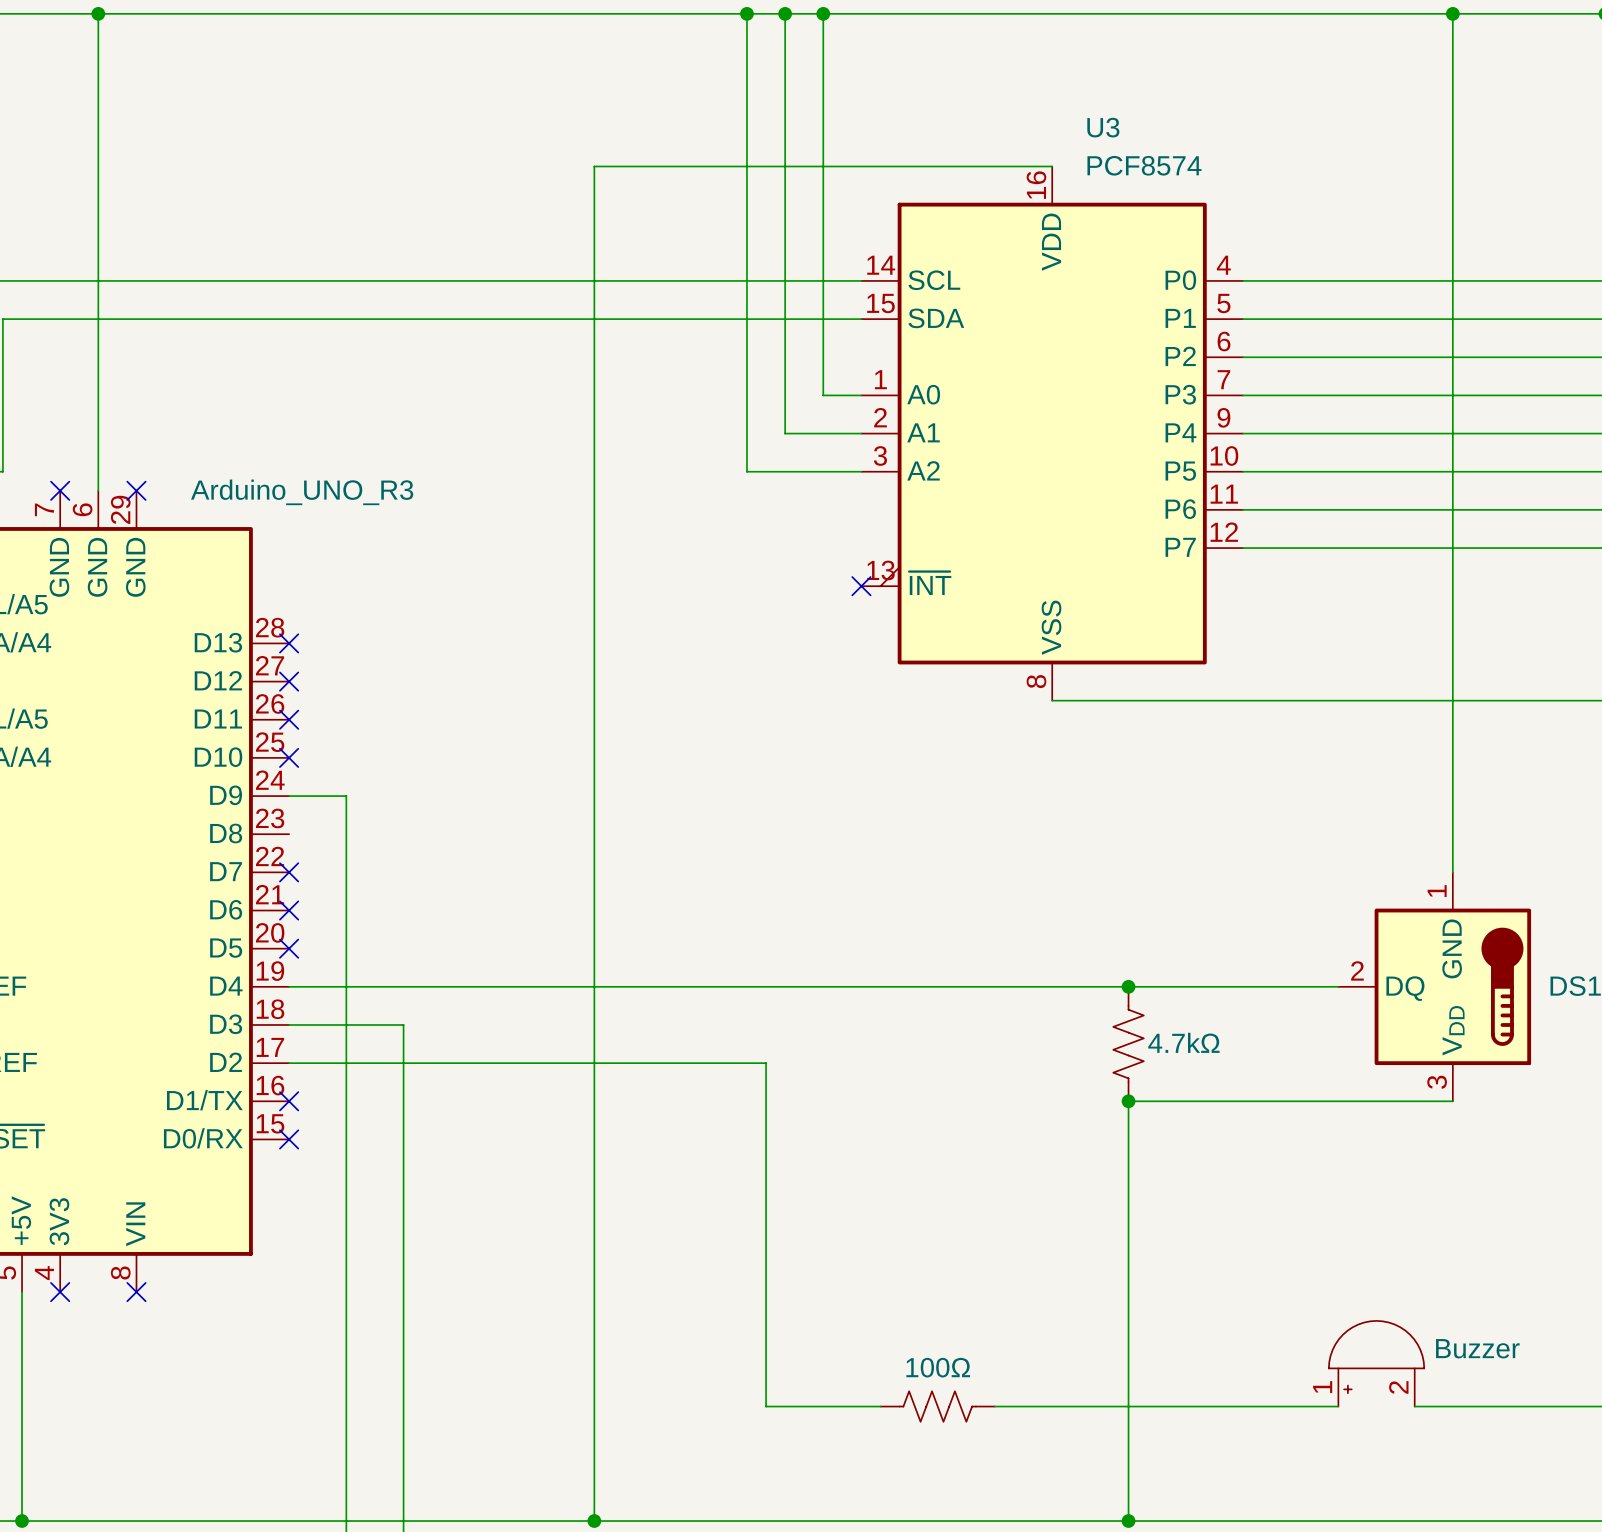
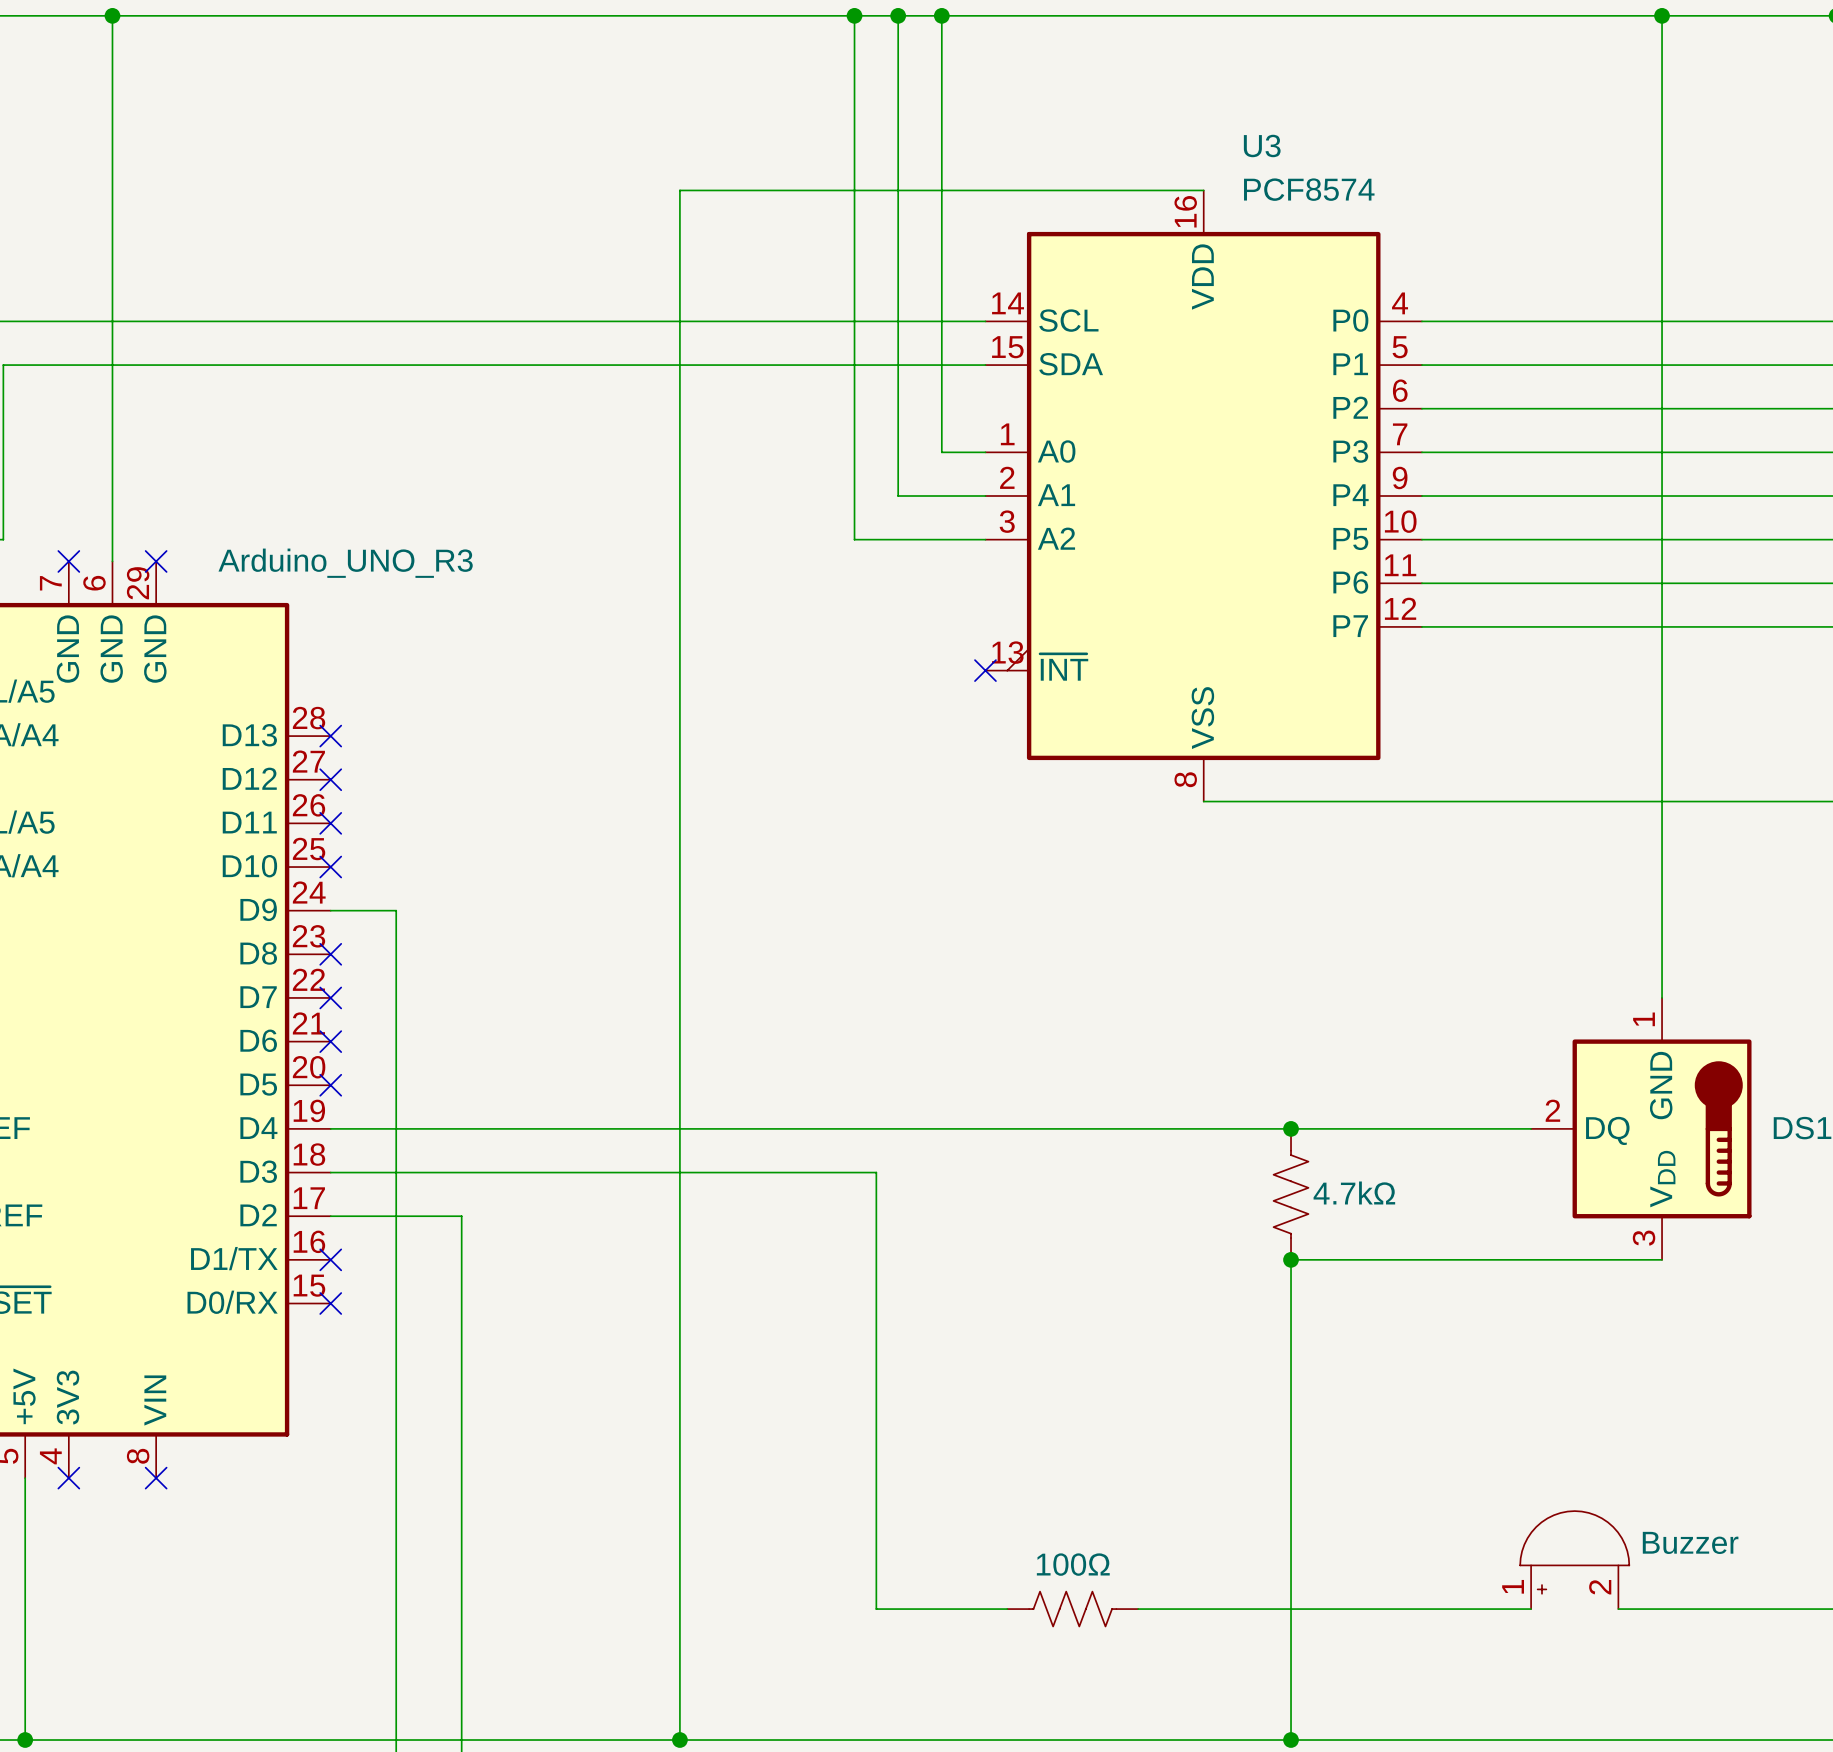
no-connect mark: none -> (330, 954)
wire: (403, 1024) (403, 1063) (766, 1063) -> (461, 1172) (876, 1172) (876, 1216)

